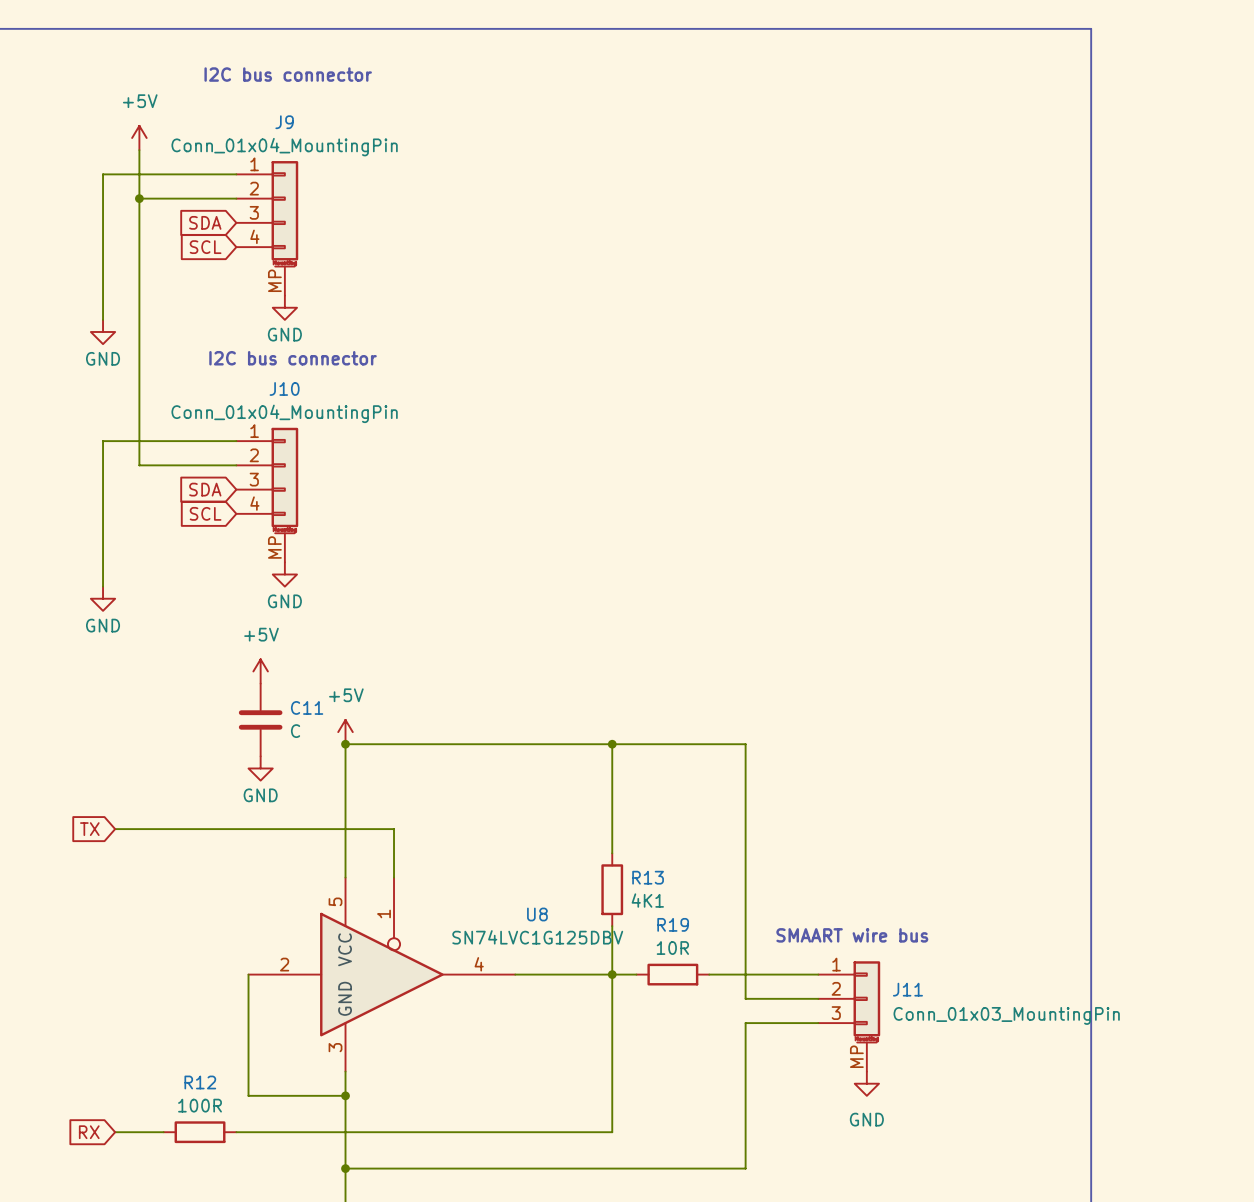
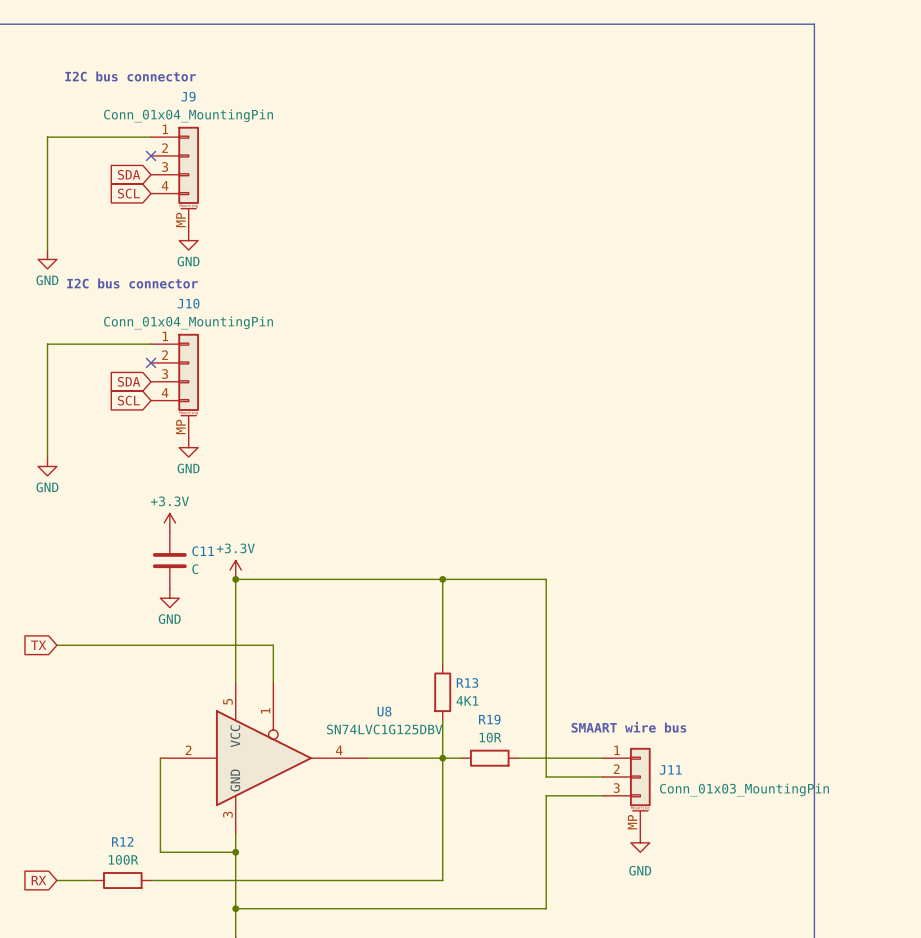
text position: I2C bus connector (288, 74) -> I2C bus connector (130, 76)
power symbol: +5V (139, 138) -> none
wire: (139, 150) (139, 465) (236, 465) -> none
wire: (139, 198) (236, 198) -> none
junction: (139, 198) -> none
no-connect mark: none -> (151, 155)
text position: I2C bus connector (293, 358) -> I2C bus connector (132, 283)
no-connect mark: none -> (151, 362)
power symbol: +5V (260, 671) -> +3.3V (169, 522)
power symbol: +5V (345, 732) -> +3.3V (235, 569)

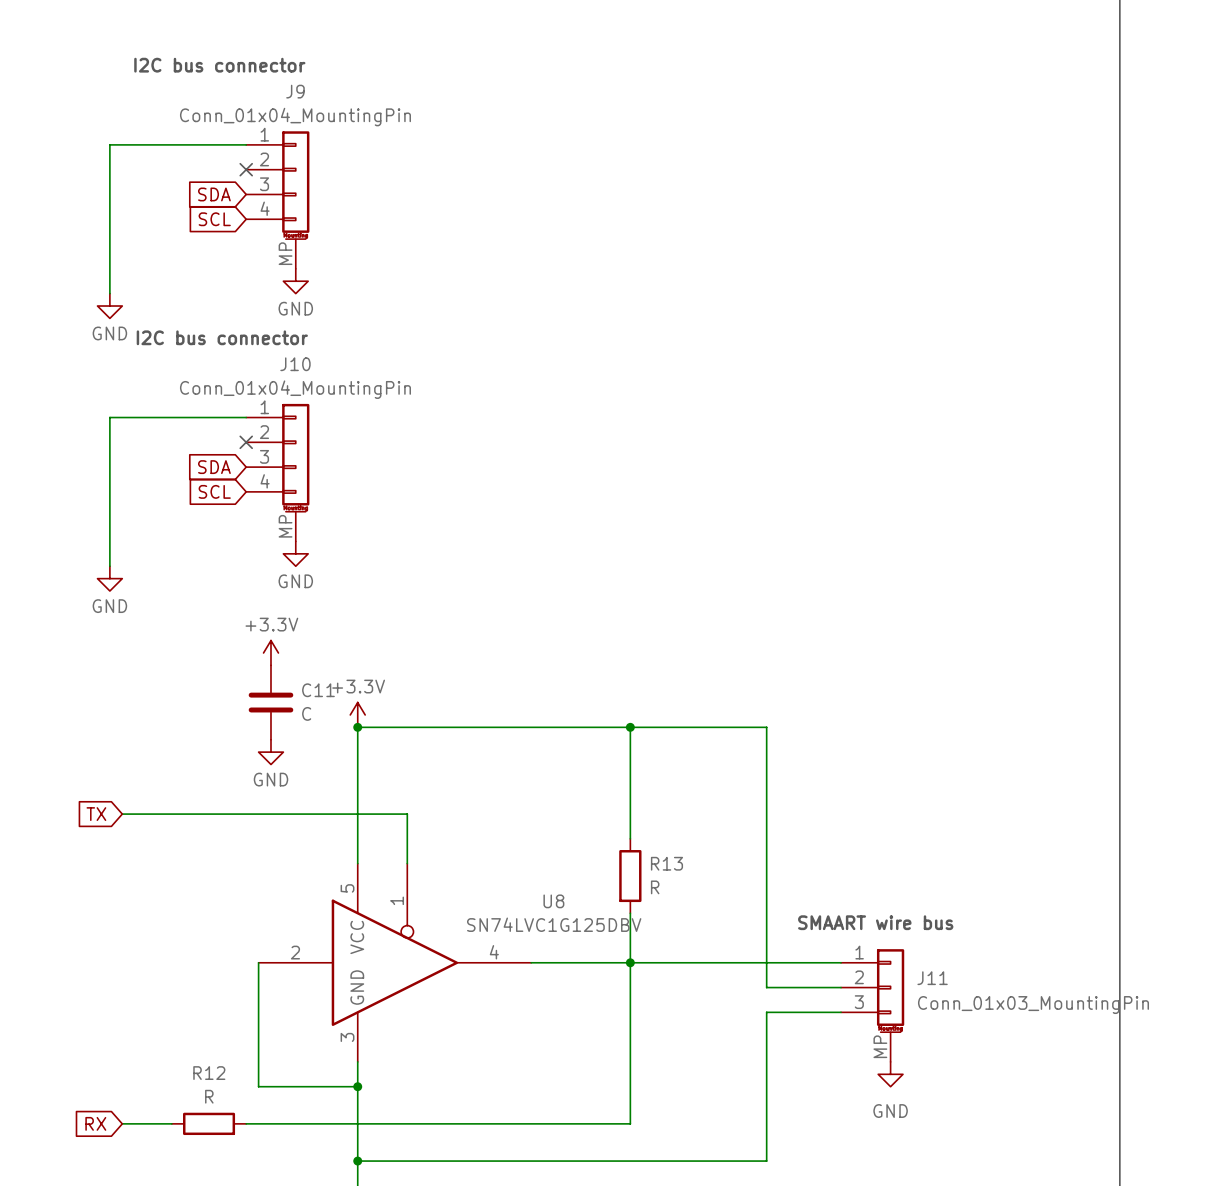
R13 value: 4K1 (467, 700) -> R (655, 887)
wire: none -> (655, 962) (729, 962)
R19: 10R (489, 758) -> none
R12 value: 100R (123, 859) -> R (209, 1096)

